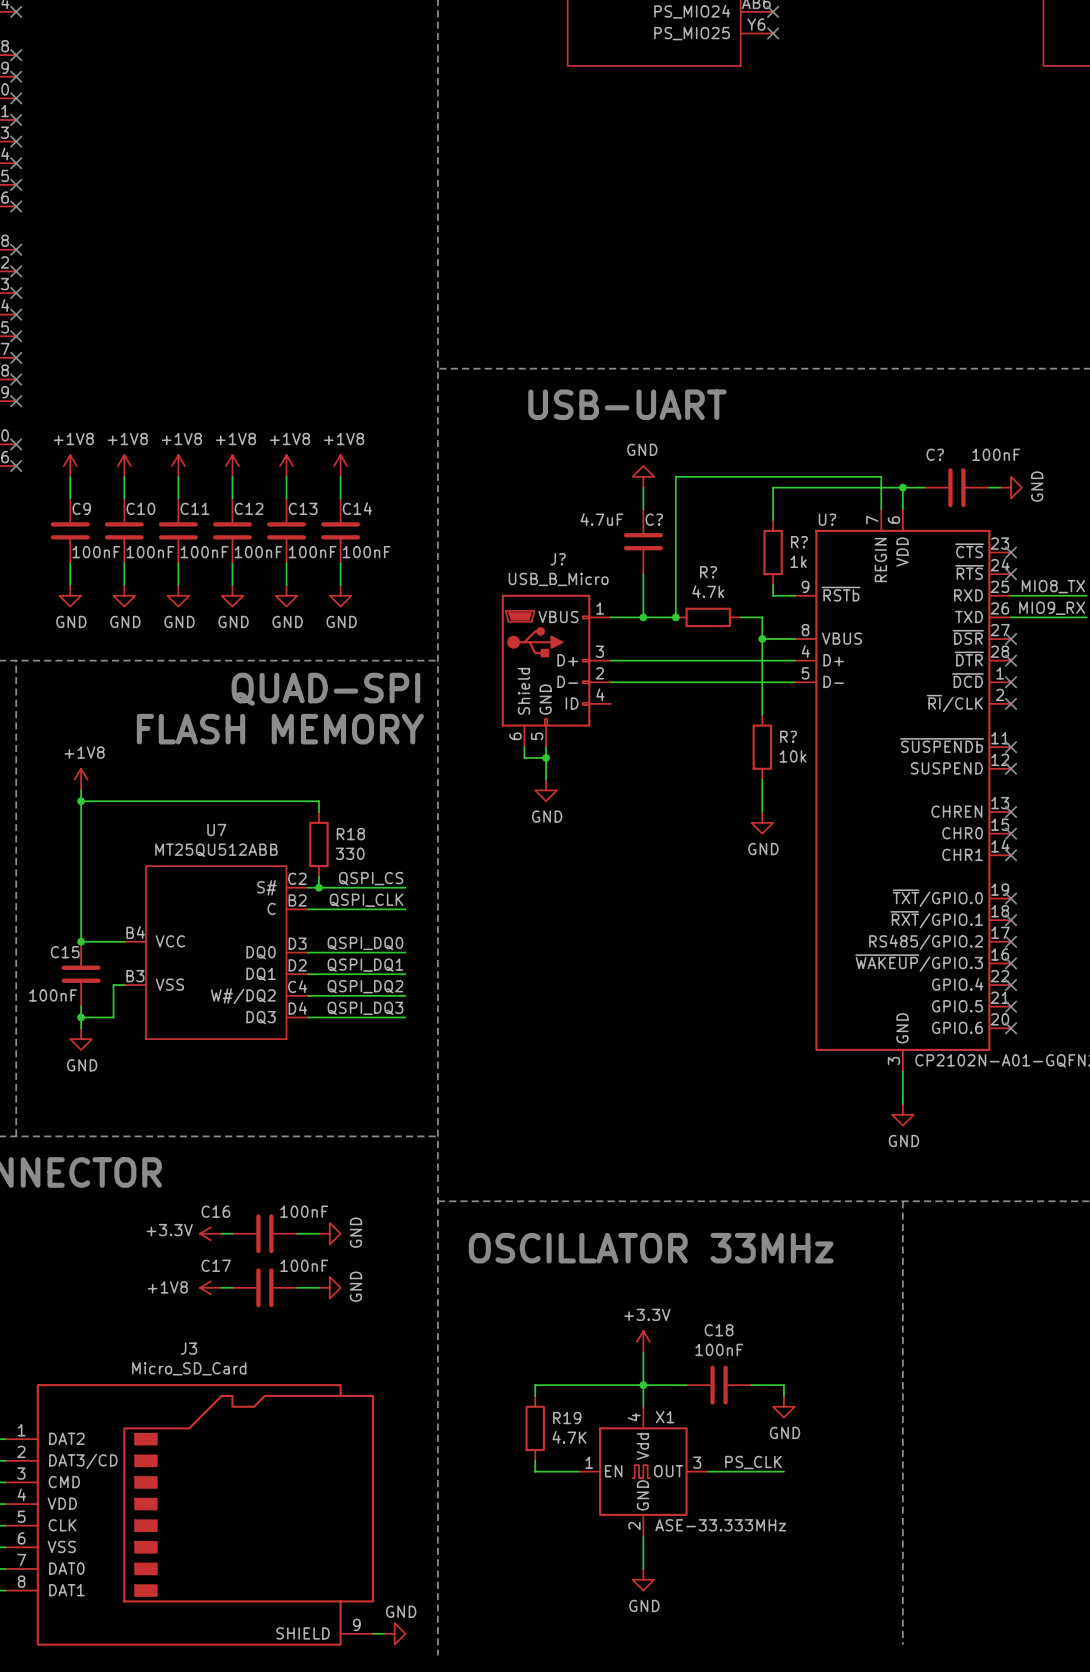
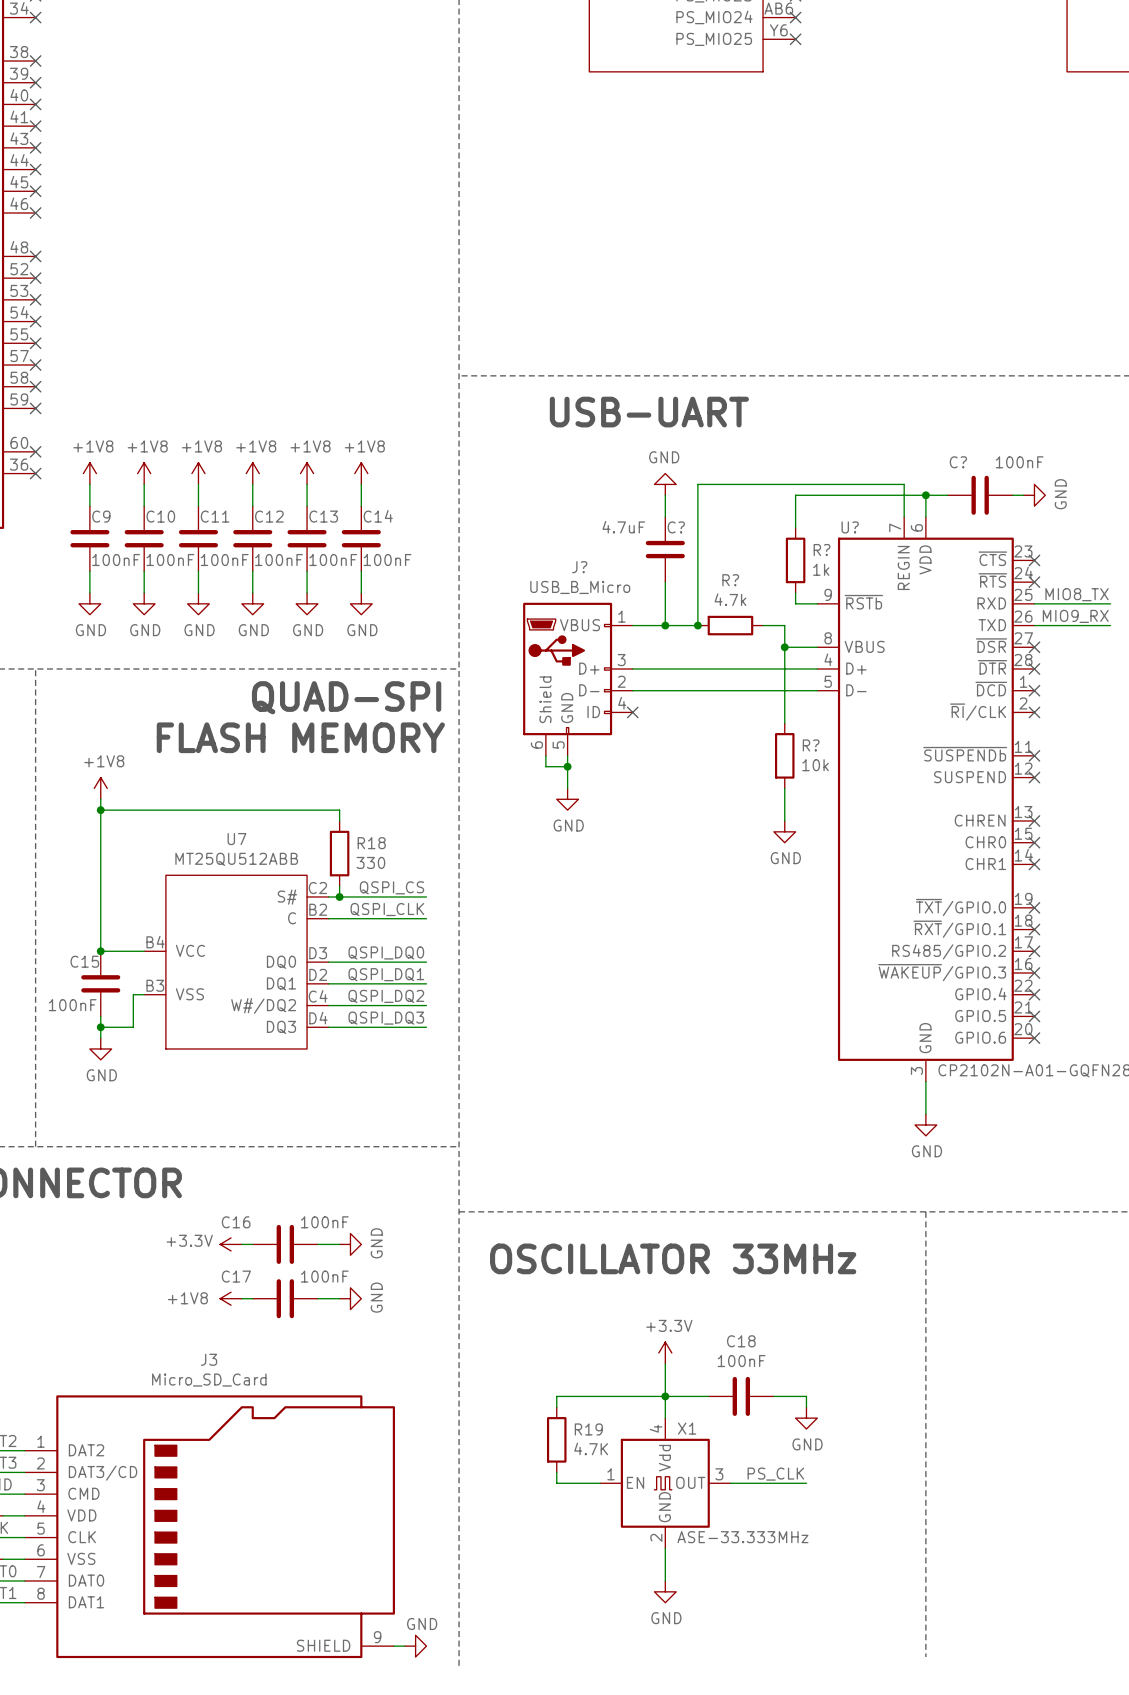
no-connect mark: none -> (632, 712)

